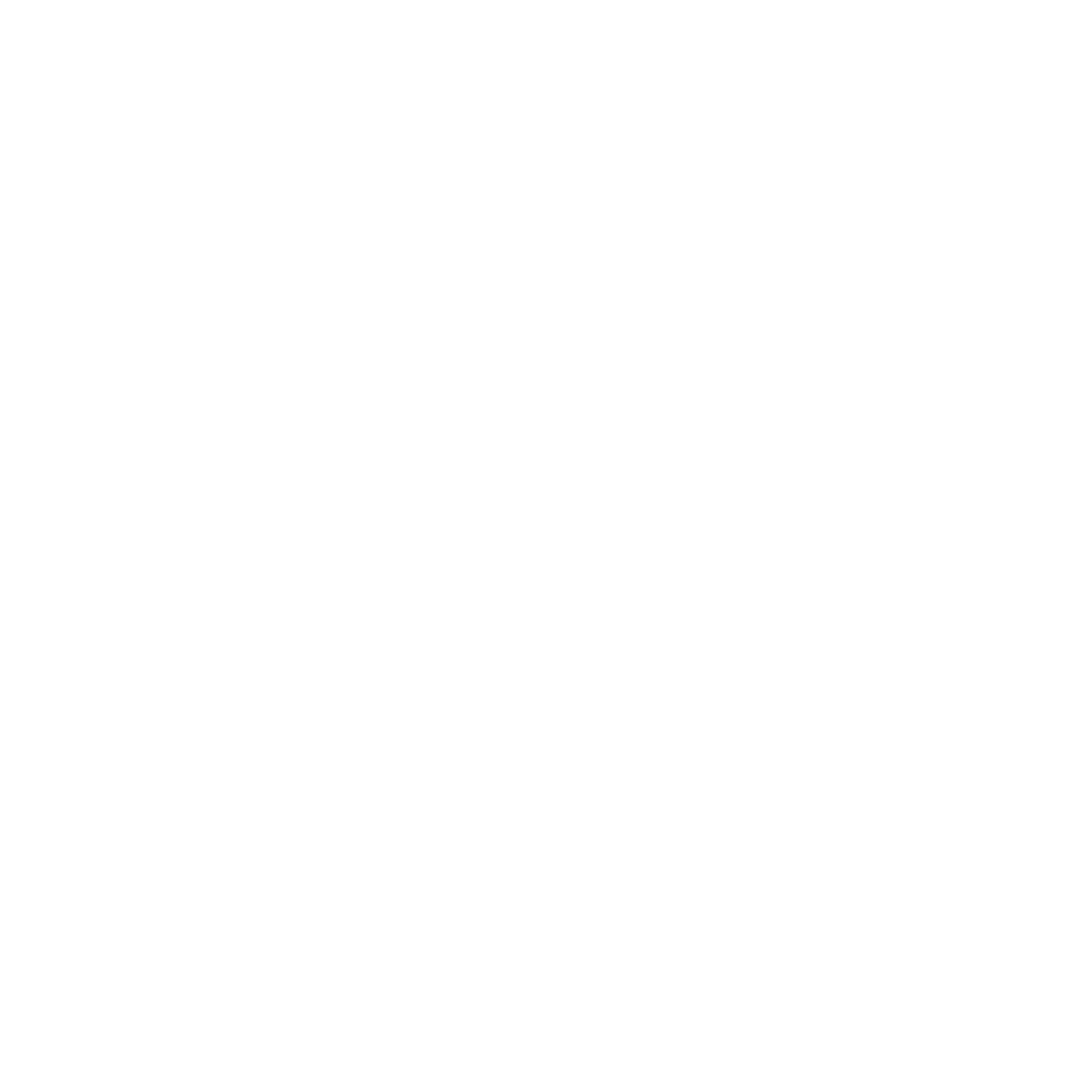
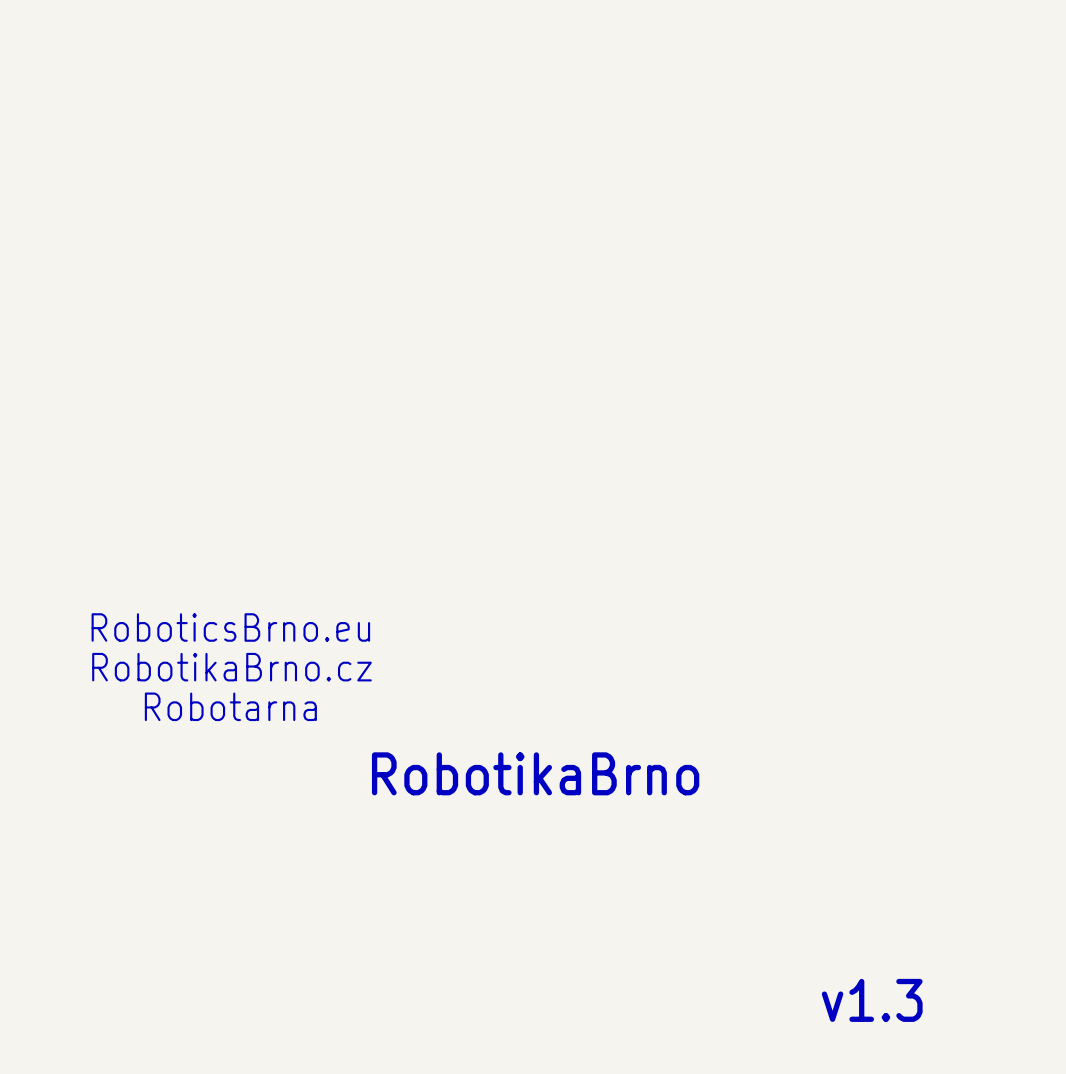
text: none -> RoboticsBrno.eu (230, 627)
text: none -> RobotikaBrno.cz (231, 667)
text: none -> Robotarna (230, 706)
text: none -> RobotikaBrno (535, 773)
text: none -> v1.3 (872, 1000)

